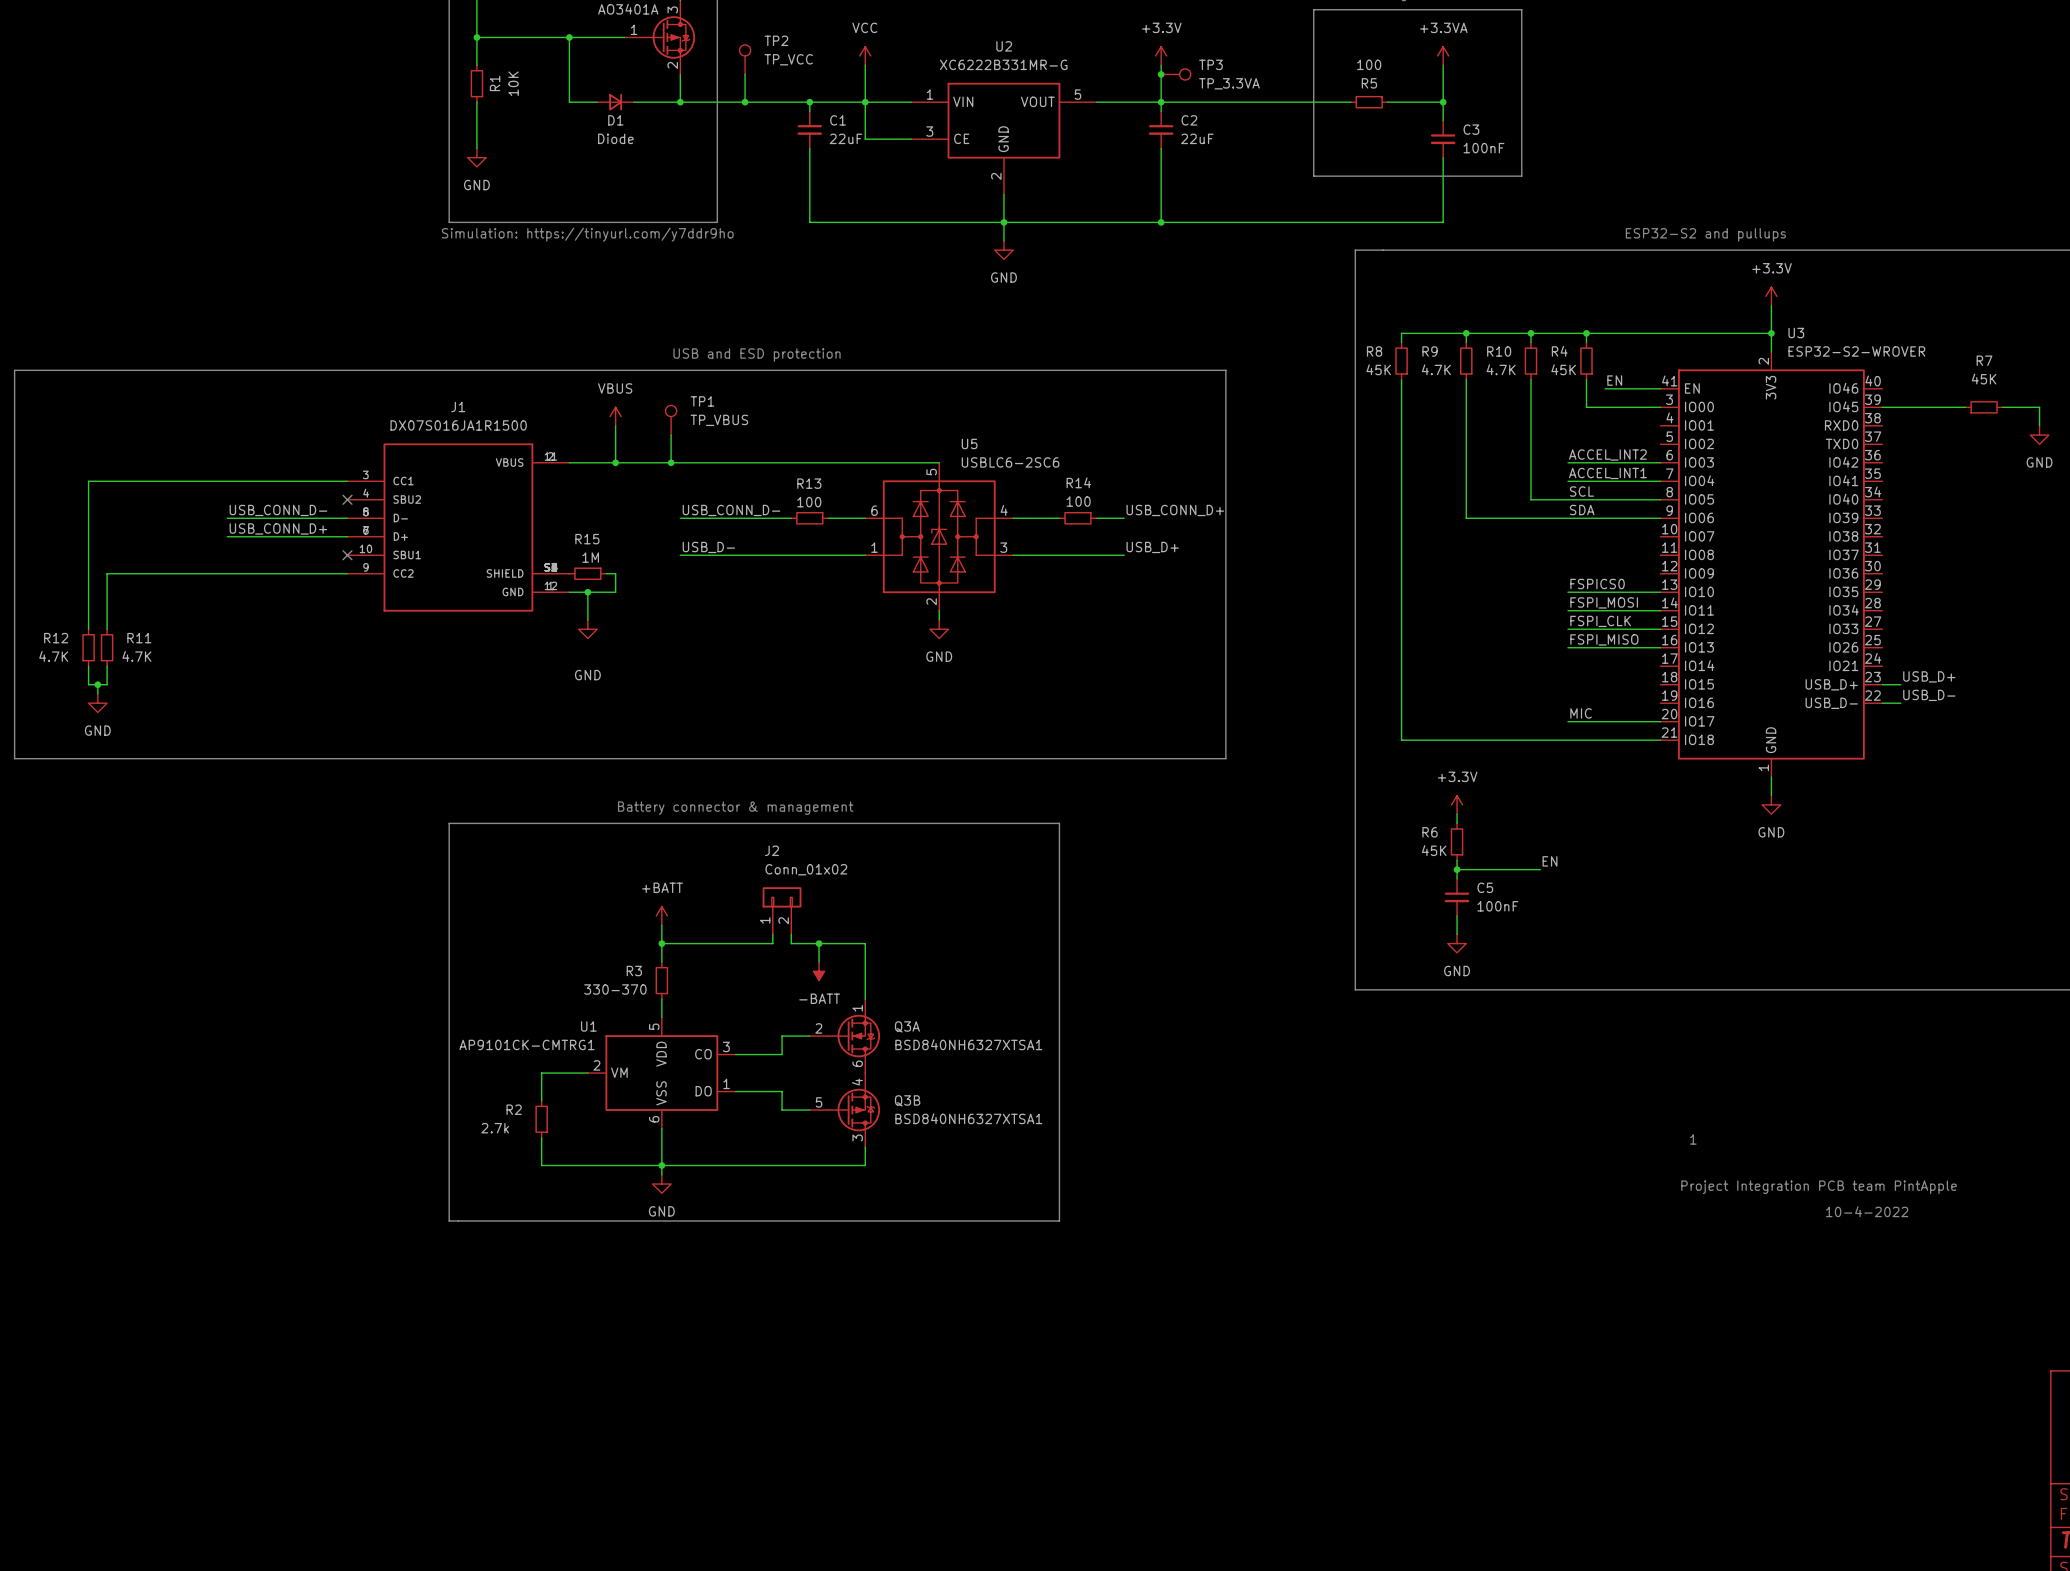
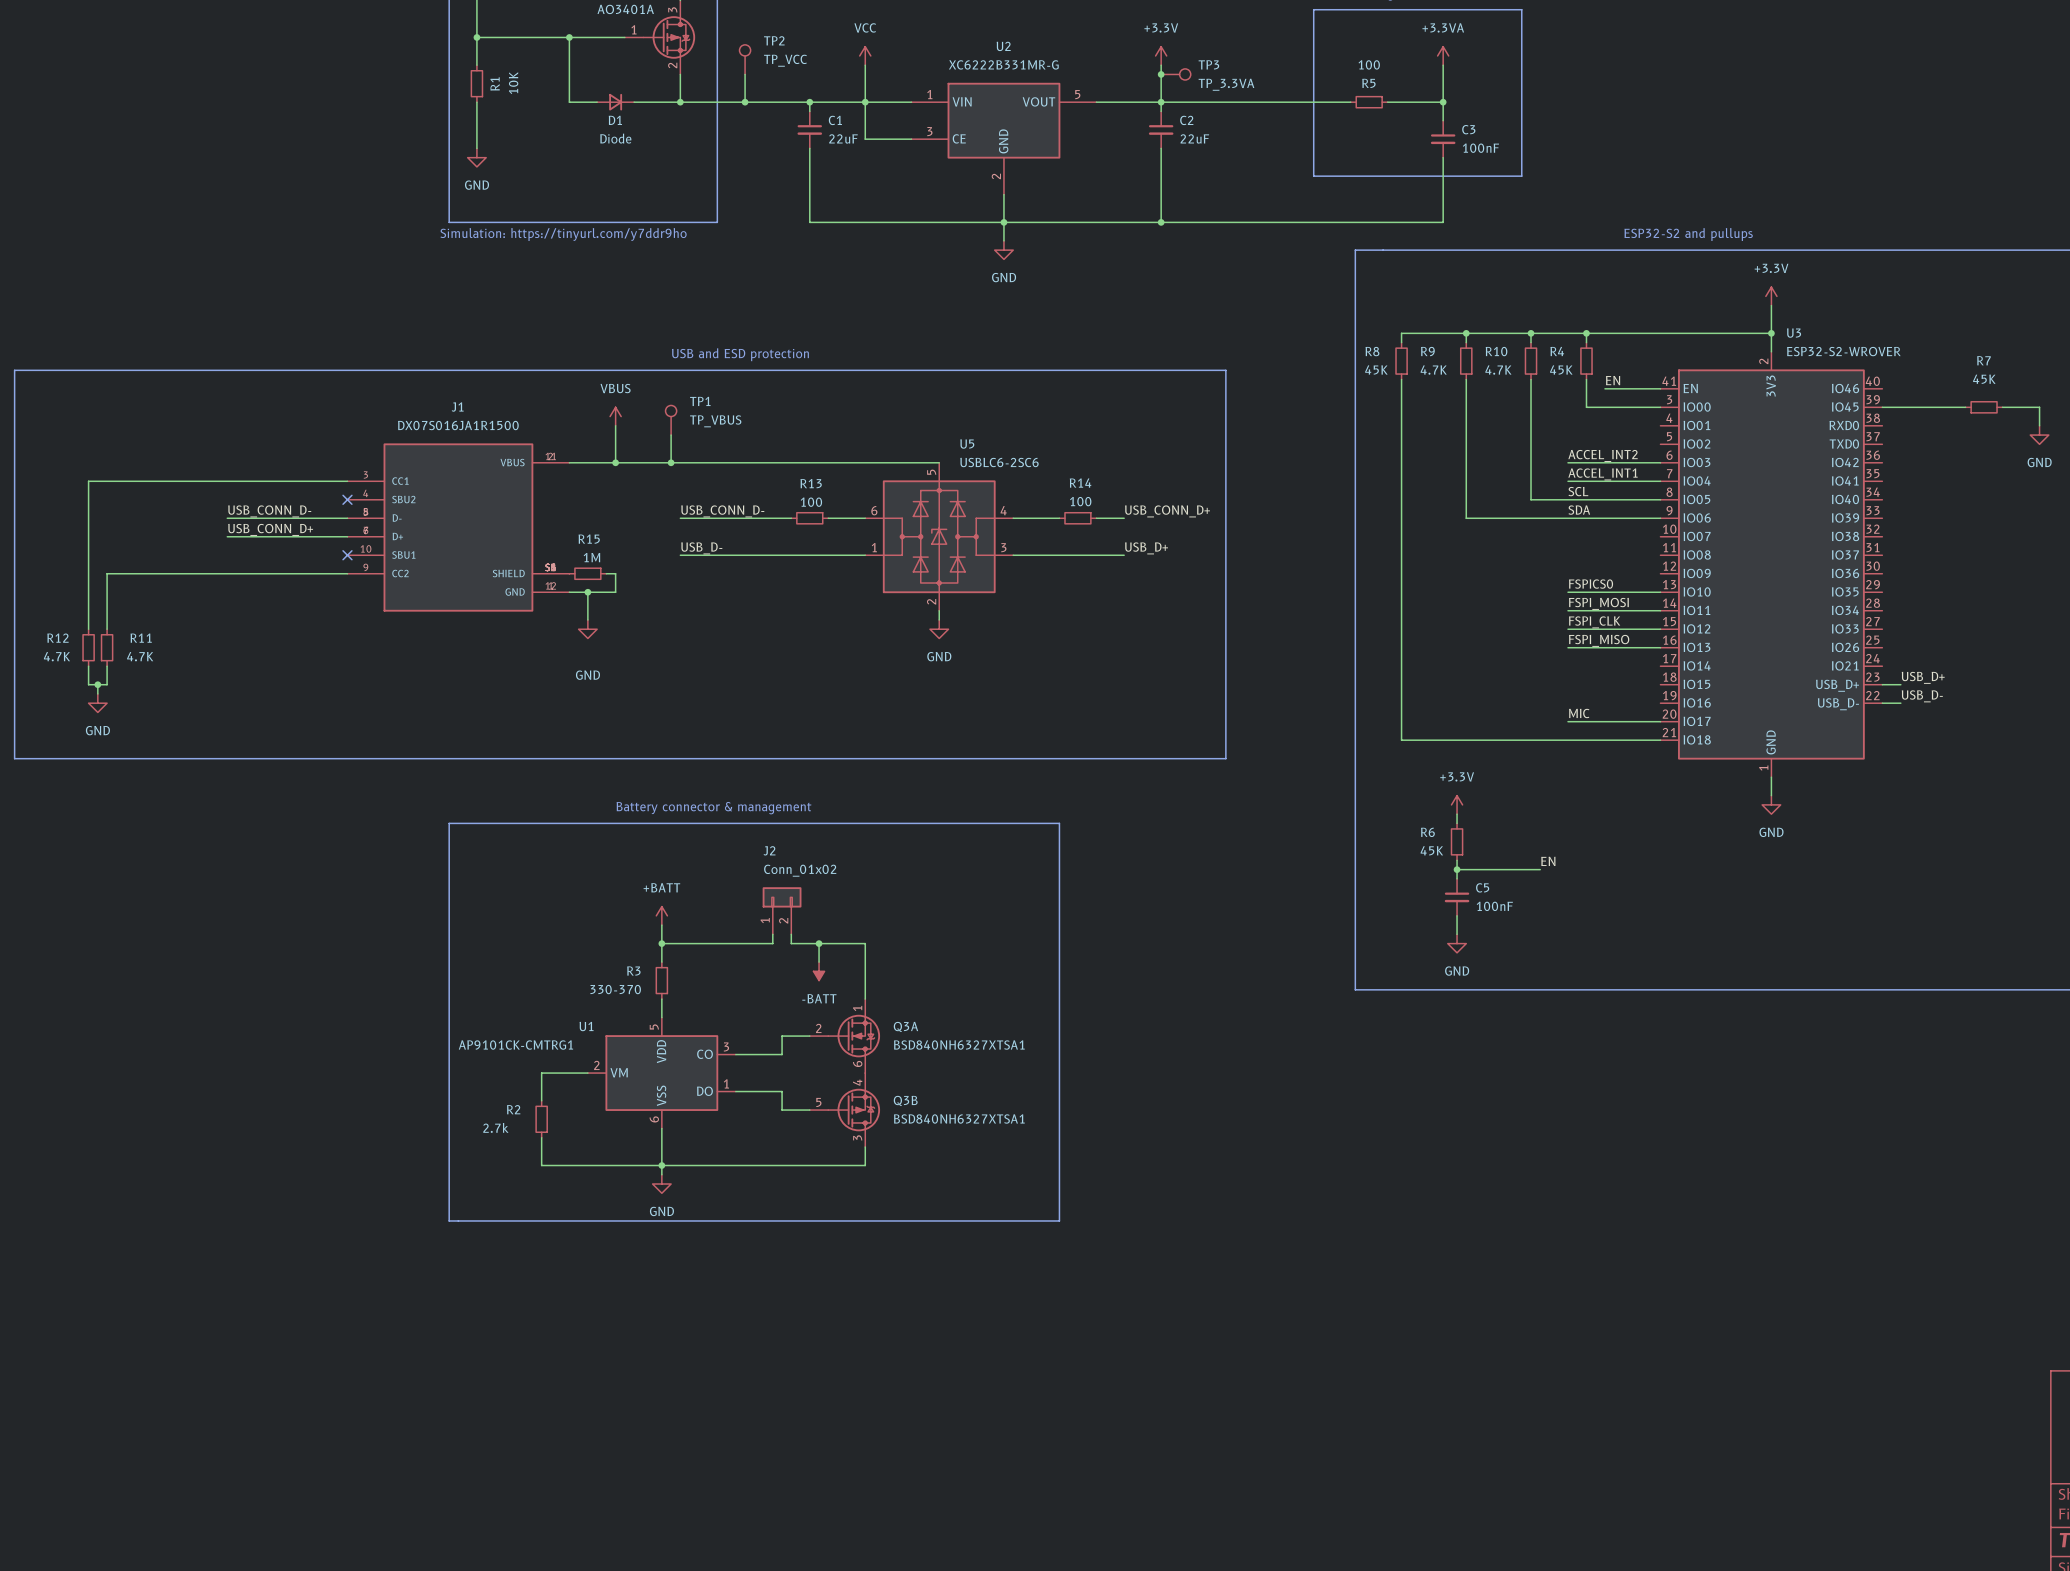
text: 1 (1693, 1139) -> none
text: Project Integration PCB team PintApple (1819, 1187) -> none
text: 10-4-2022 (1867, 1211) -> none

